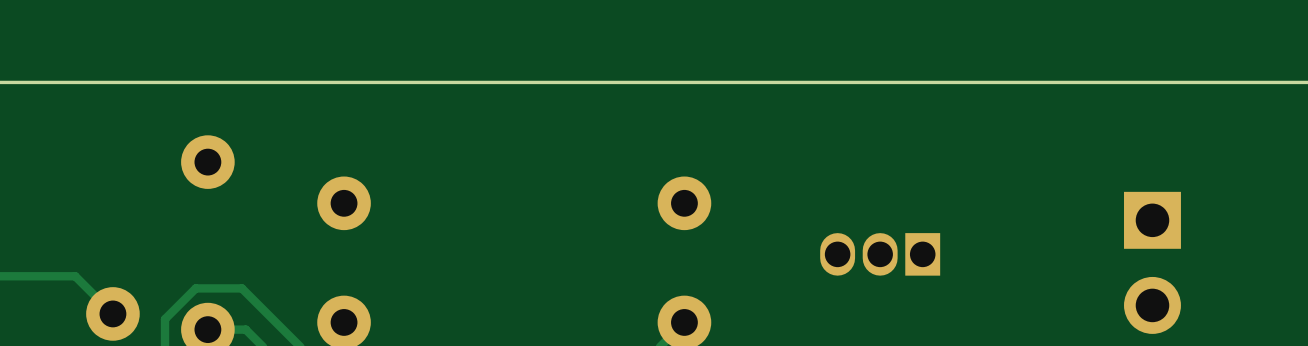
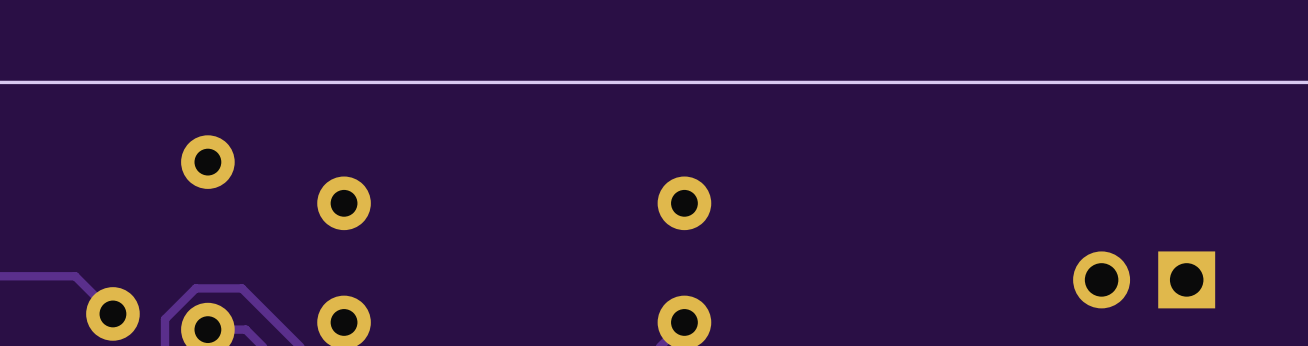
part: (880, 254) -> none
part rotation: 0° (1152, 262) -> 90° clockwise (1144, 279)

